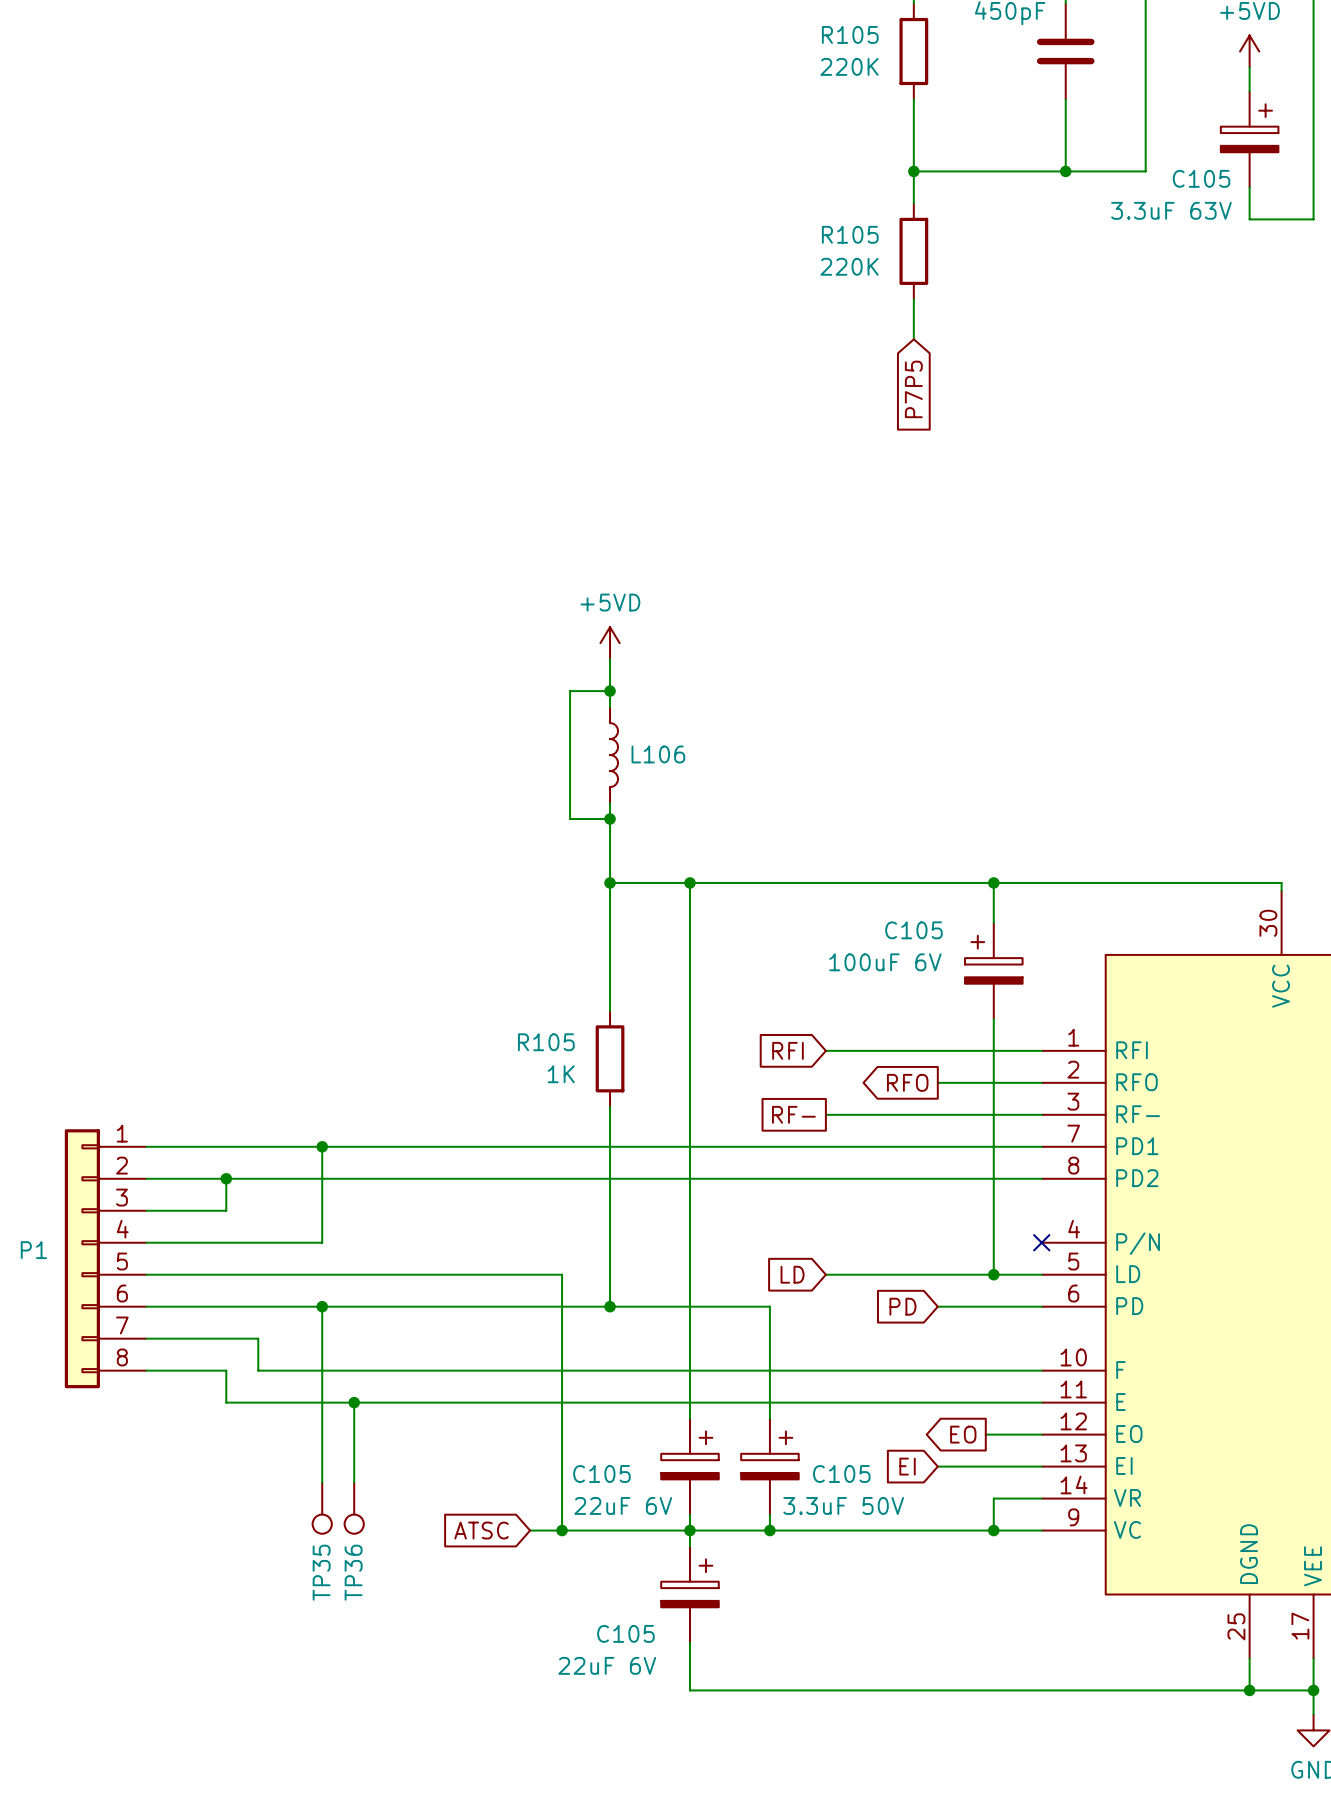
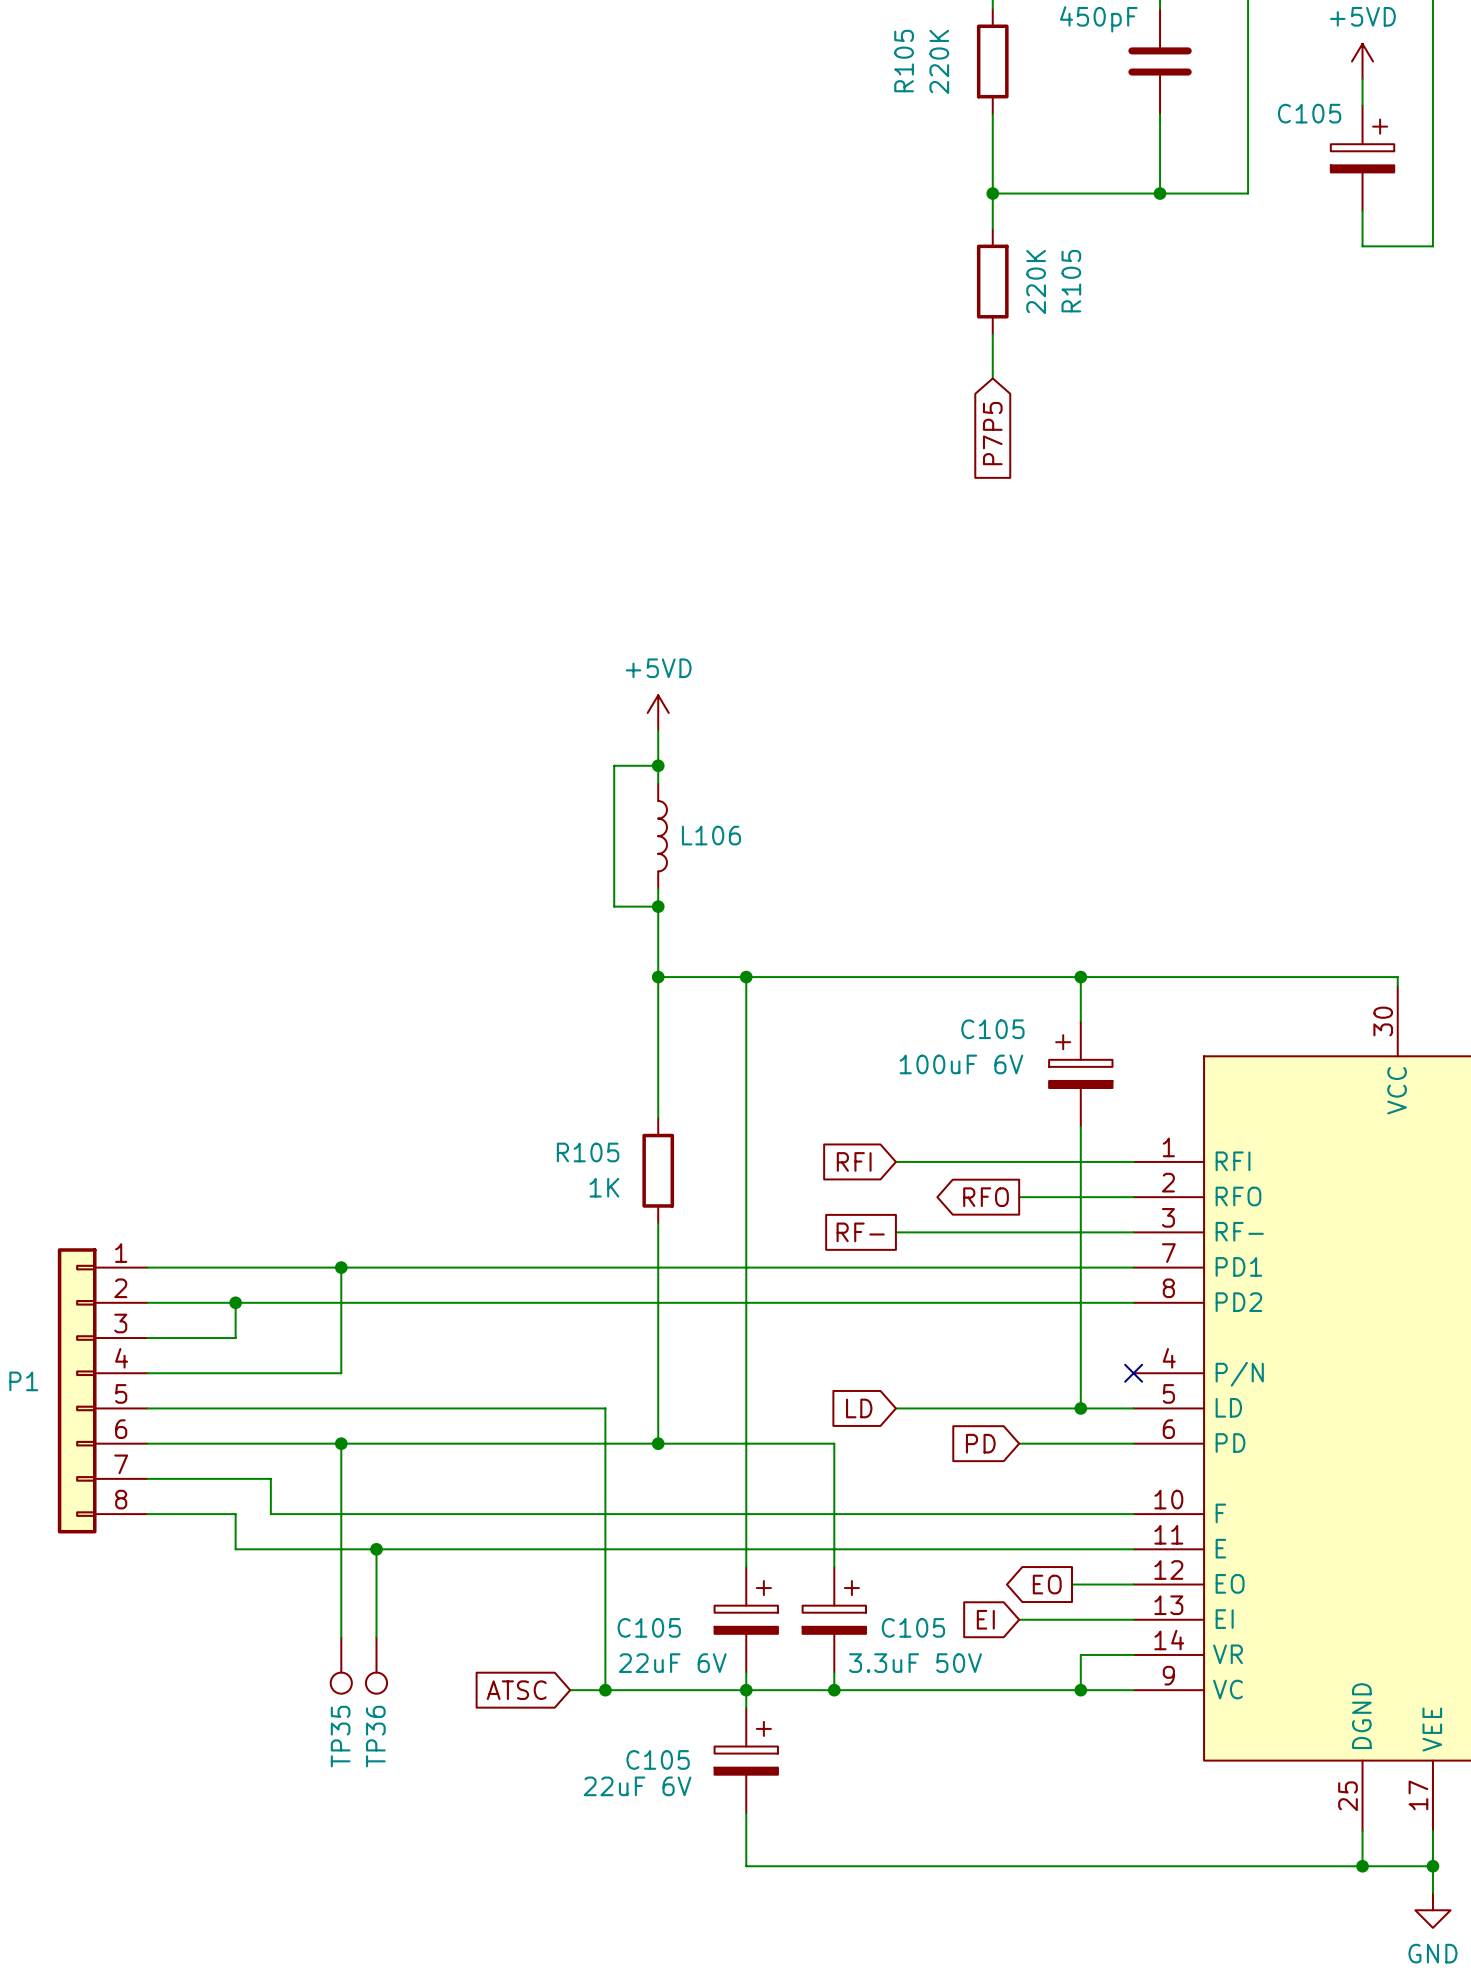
R105 name rotation: 0° (850, 34) -> 90° counterclockwise (904, 61)
R105 value rotation: 0° (849, 66) -> 90° counterclockwise (939, 61)
C105 name position: C105 (1201, 178) -> C105 (1309, 113)
C105 value: 3.3uF 63V (1171, 210) -> none
R105 name rotation: 0° (850, 234) -> 90° counterclockwise (1071, 281)
R105 name position: R105 (850, 234) -> R105 (1071, 281)
R105 value rotation: 0° (849, 266) -> 90° counterclockwise (1036, 281)
R105 value position: 220K (849, 266) -> 220K (1036, 281)
C105 name position: C105 (625, 1633) -> C105 (658, 1759)
C105 value position: 22uF 6V (607, 1665) -> 22uF 6V (637, 1786)

